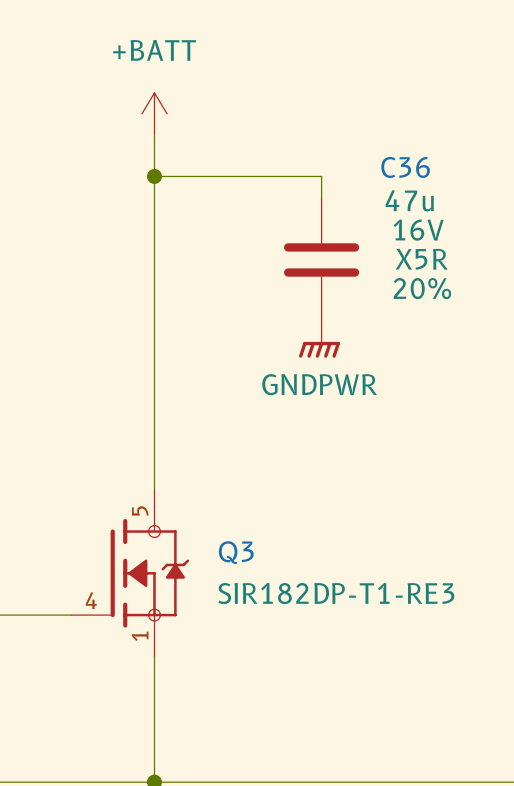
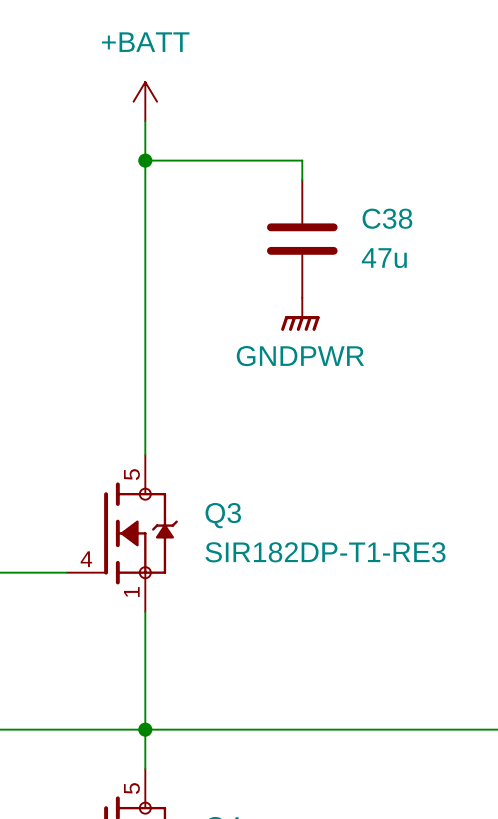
C36 name: C36 (405, 167) -> C38 (387, 218)
C36 value position: 47u (409, 200) -> 47u (384, 258)
C36 text: 16V (418, 230) -> none
C36 text: X5R (421, 259) -> none
C36 text: 20% (422, 288) -> none

